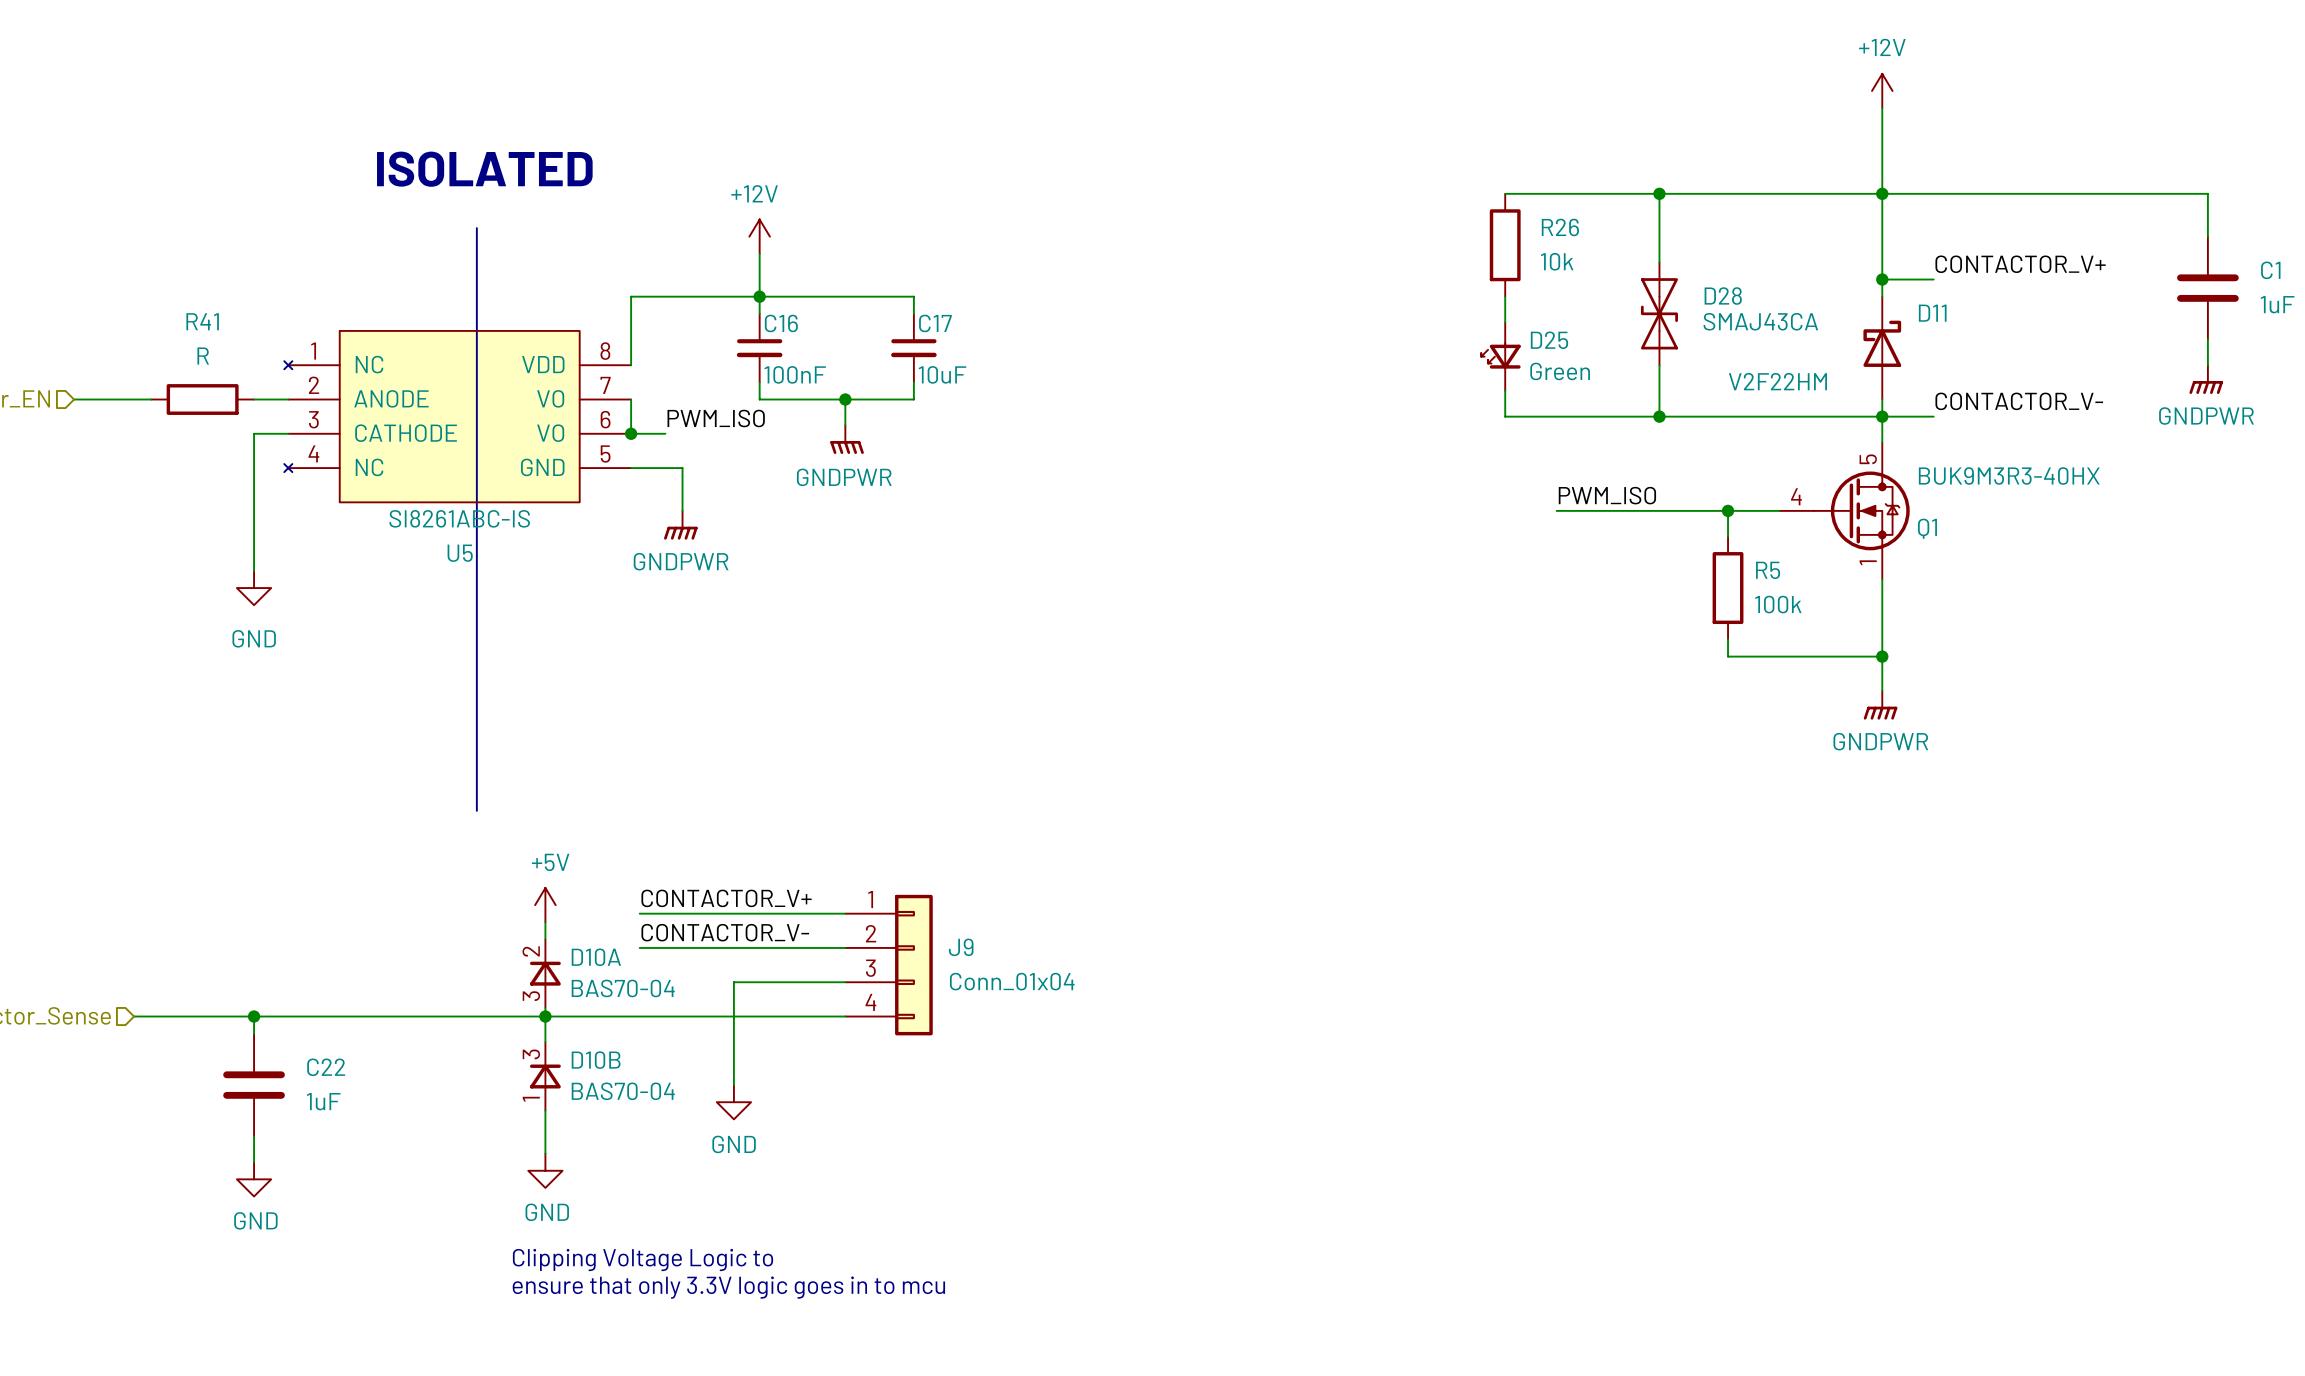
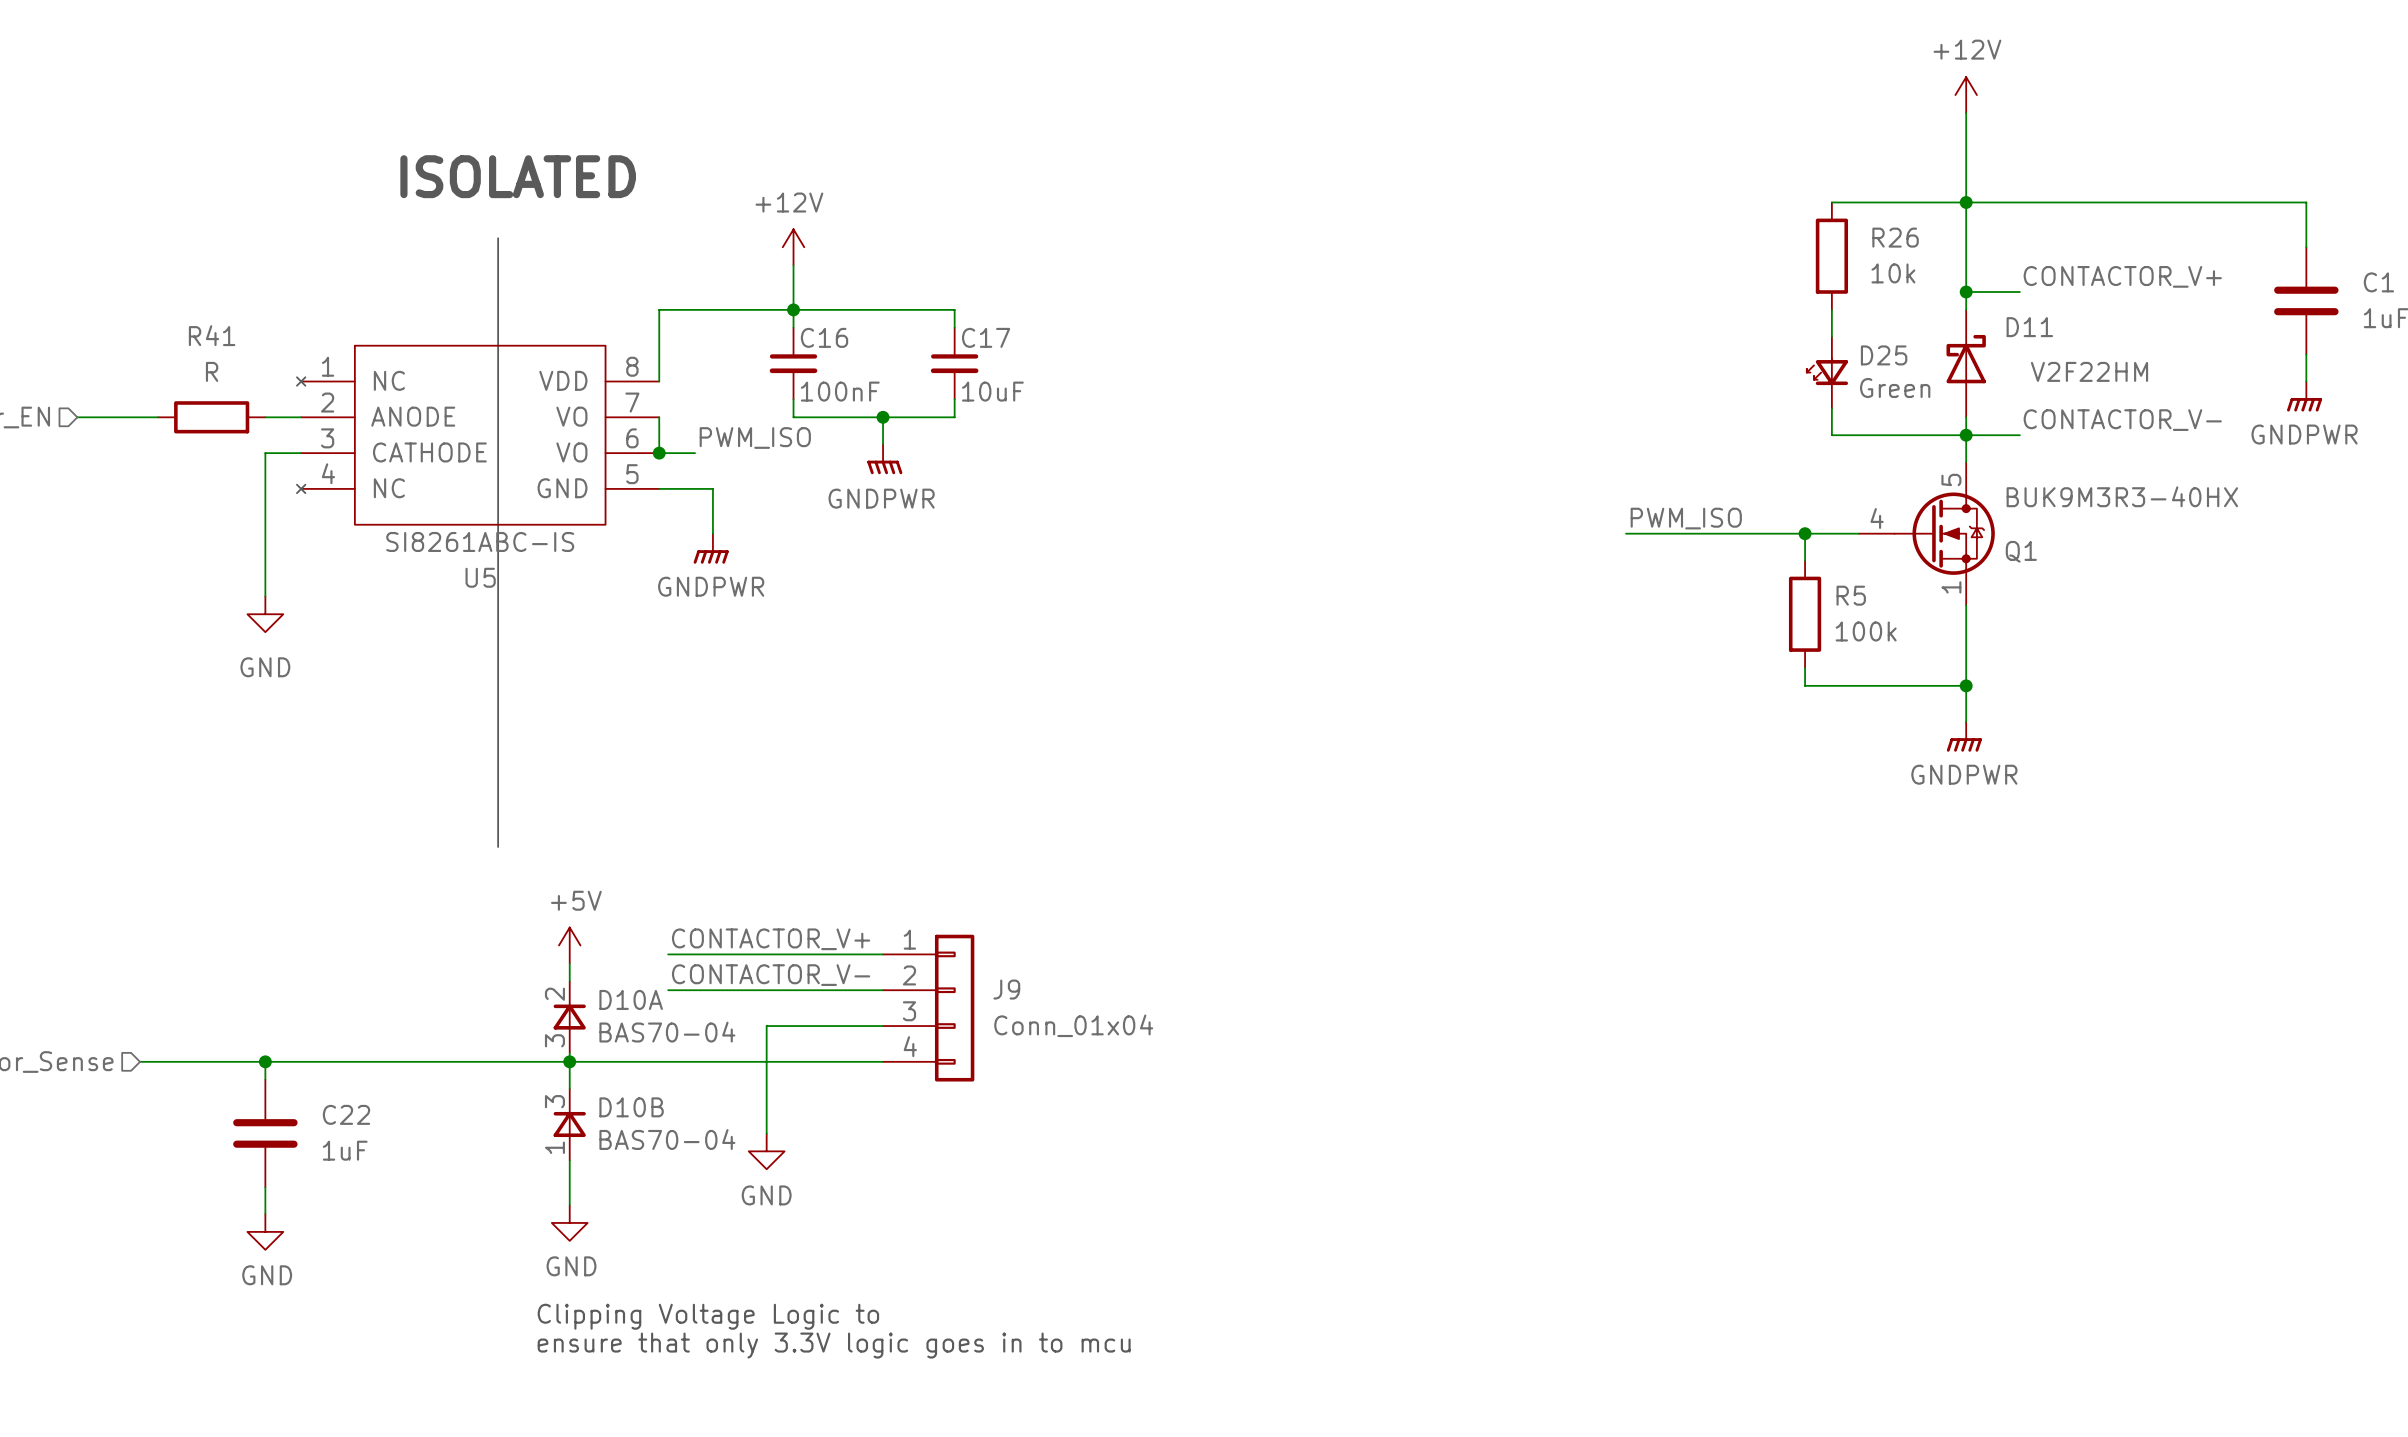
wire: (1505, 193) (1753, 193) -> none
wire: (1659, 193) (1659, 262) -> none
junction: (1659, 193) -> none
R26 position: (1505, 245) -> (1831, 256)
wire: (1505, 296) (1505, 322) -> (1831, 309) (1831, 336)
D28: SMAJ43CA (1659, 313) -> none
D25 position: (1500, 356) -> (1827, 372)
wire: (1659, 365) (1659, 416) -> none
D11 value position: V2F22HM (1777, 381) -> V2F22HM (2089, 371)
wire: (1505, 390) (1505, 416) (1753, 416) -> (1831, 408) (1831, 435)
junction: (1659, 416) -> none

